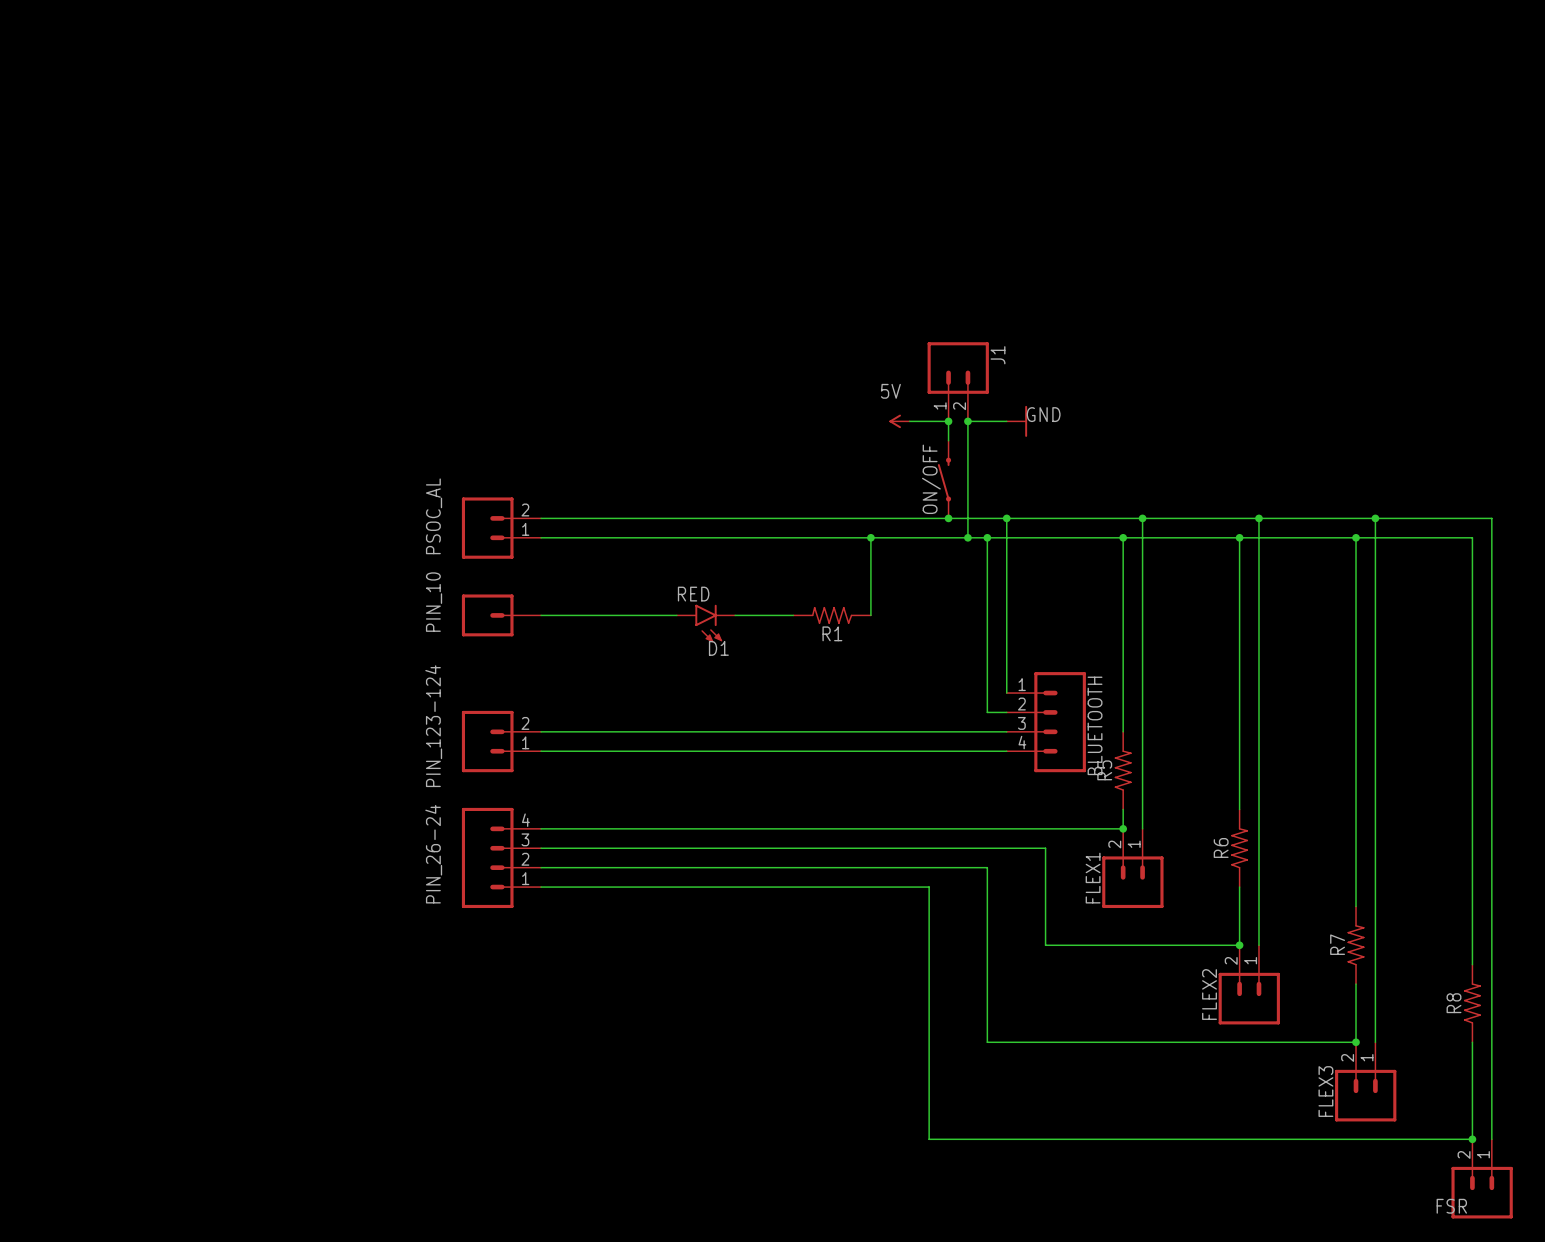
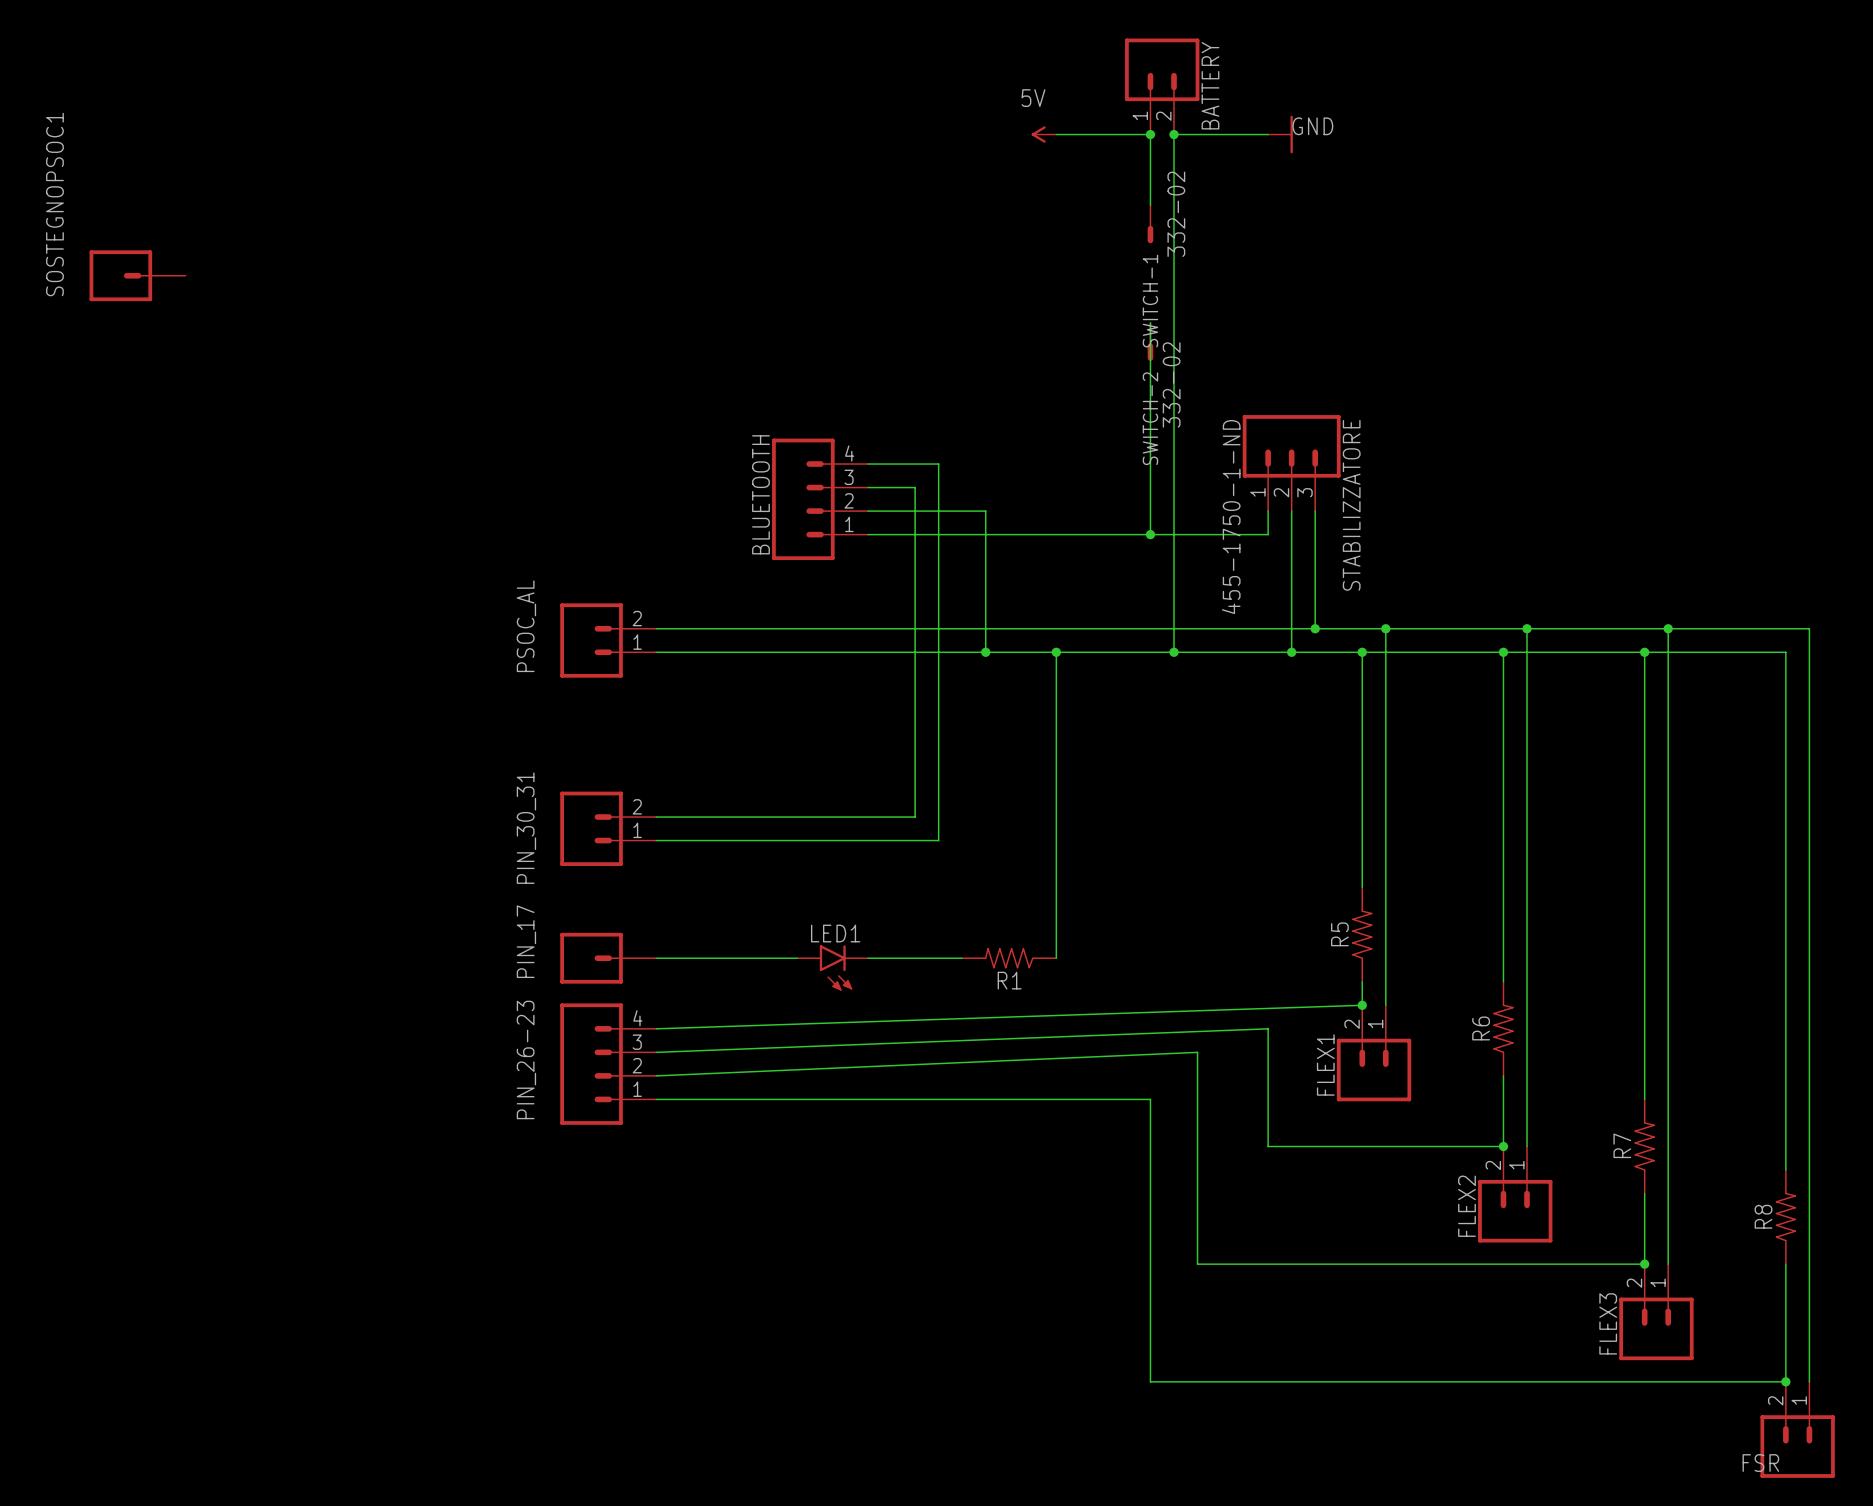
BATTERY: none -> (1162, 86)
power symbol: none -> 5V (1043, 134)
wire: none -> (1056, 134) (1150, 134) (1150, 205)
junction: none -> (1150, 134)
junction: none -> (1173, 134)
power symbol: none -> GND (1280, 134)
SWITCH-1: none -> 332-02 (1150, 224)
SOSTEGNOPSOC1: none -> (137, 275)
SWITCH-2: none -> 332-02 (1150, 341)
J1: (958, 381) -> none
STABILIZZATORE: none -> 455-1750-1-ND (1291, 463)
wire: none -> (868, 464) (938, 464) (938, 840) (656, 840)
wire: none -> (868, 487) (915, 487) (915, 817) (656, 817)
BLUETOOTH: none -> (820, 499)
wire: none -> (868, 511) (985, 511) (985, 652)
power symbol: 5V (899, 421) -> none
wire: (909, 421) (948, 421) -> (1150, 322) (1150, 511)
junction: (948, 421) -> none
wire: (967, 421) (1006, 421) -> (1173, 511) (1173, 134) (1268, 134)
junction: (967, 421) -> none
power symbol: GND (1016, 421) -> none
wire: none -> (1268, 511) (1268, 534) (868, 534)
wire: none -> (1291, 511) (1291, 652)
wire: none -> (1315, 511) (1315, 628)
junction: none -> (1150, 534)
ON/OFF: (944, 479) -> none
junction: (948, 518) -> none
wire: (1006, 518) (1006, 693) -> (1056, 746) (1056, 958)
junction: (1006, 518) -> none
junction: none -> (1315, 628)
junction: none -> (985, 652)
wire: (987, 537) (987, 712) (1006, 712) -> none
junction: (987, 537) -> none
junction: none -> (1291, 652)
PIN_10: (501, 615) -> none
wire: (541, 615) (676, 615) -> none
wire: (735, 615) (793, 615) -> none
R1 position: (832, 615) -> (1009, 958)
D1: RED (706, 623) -> none
PIN_30_31: none -> (608, 828)
BLUETOOTH: (1046, 722) -> none
wire: (541, 731) (1006, 731) -> none
PIN_123-124: (501, 741) -> none
wire: (541, 751) (1006, 751) -> none
PIN_17: none -> (608, 958)
wire: none -> (656, 958) (797, 958)
wire: none -> (868, 958) (962, 958)
LED1: none -> (832, 967)
wire: (541, 828) (1123, 828) -> (656, 1028) (1362, 1005)
wire: (541, 848) (1045, 848) -> (656, 1052) (1268, 1028)
PIN_26-24: (501, 857) -> none
wire: (541, 867) (987, 867) -> (656, 1075) (1197, 1052)
PIN_26-23: none -> (608, 1064)
wire: (541, 887) (929, 887) (929, 1139) (948, 1139) -> (656, 1099) (1150, 1099) (1150, 1381)

